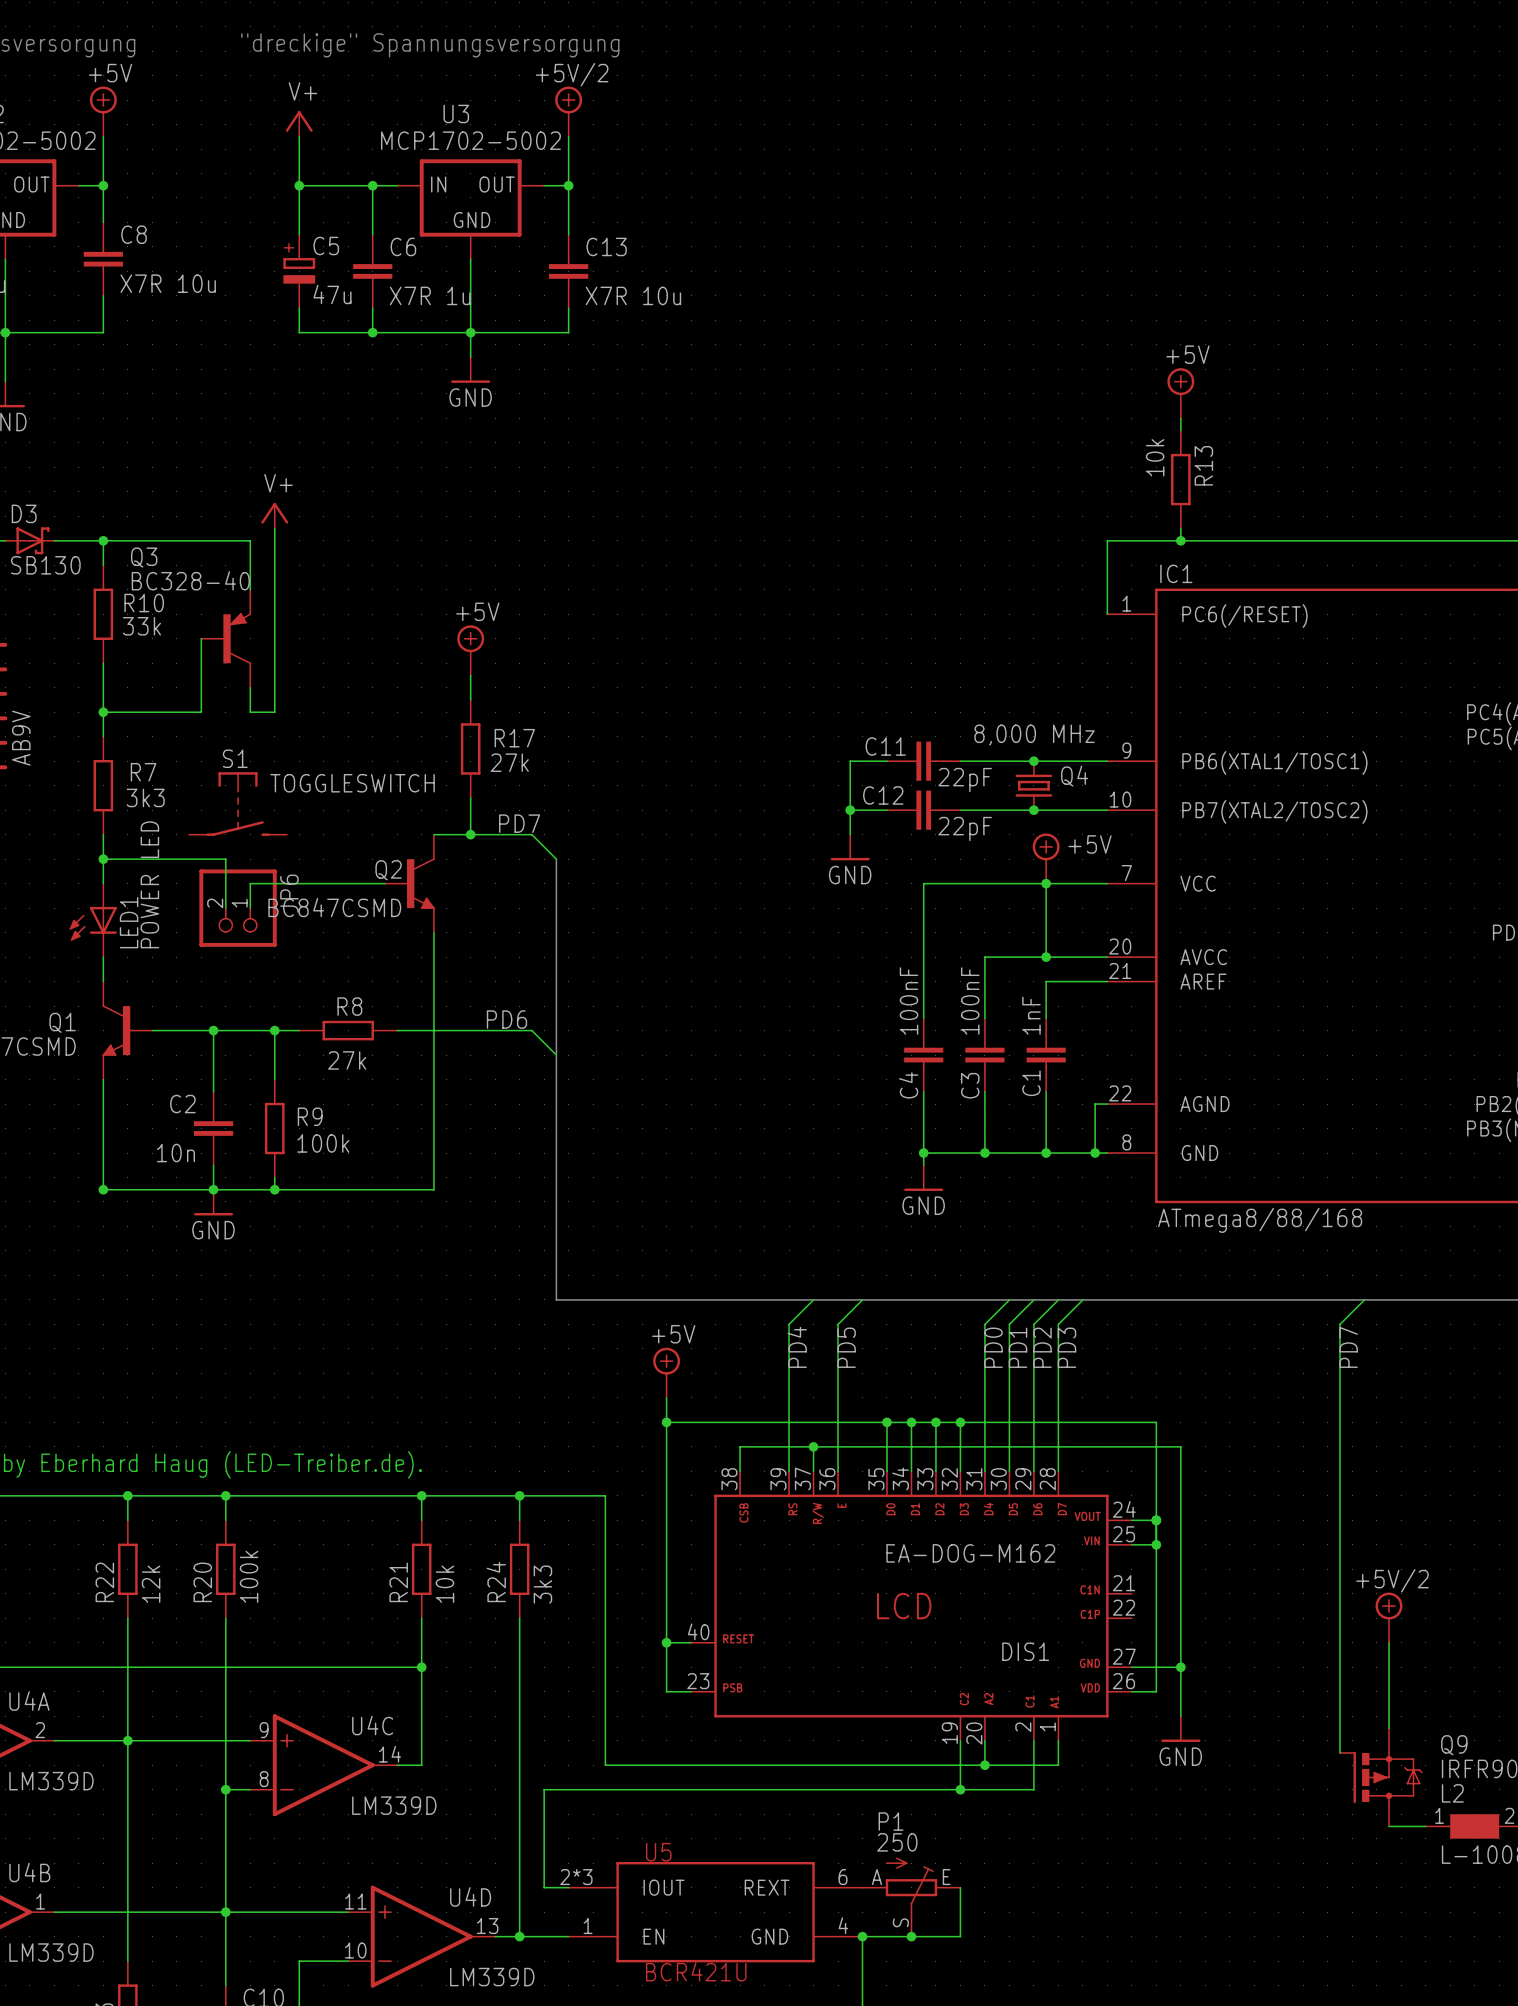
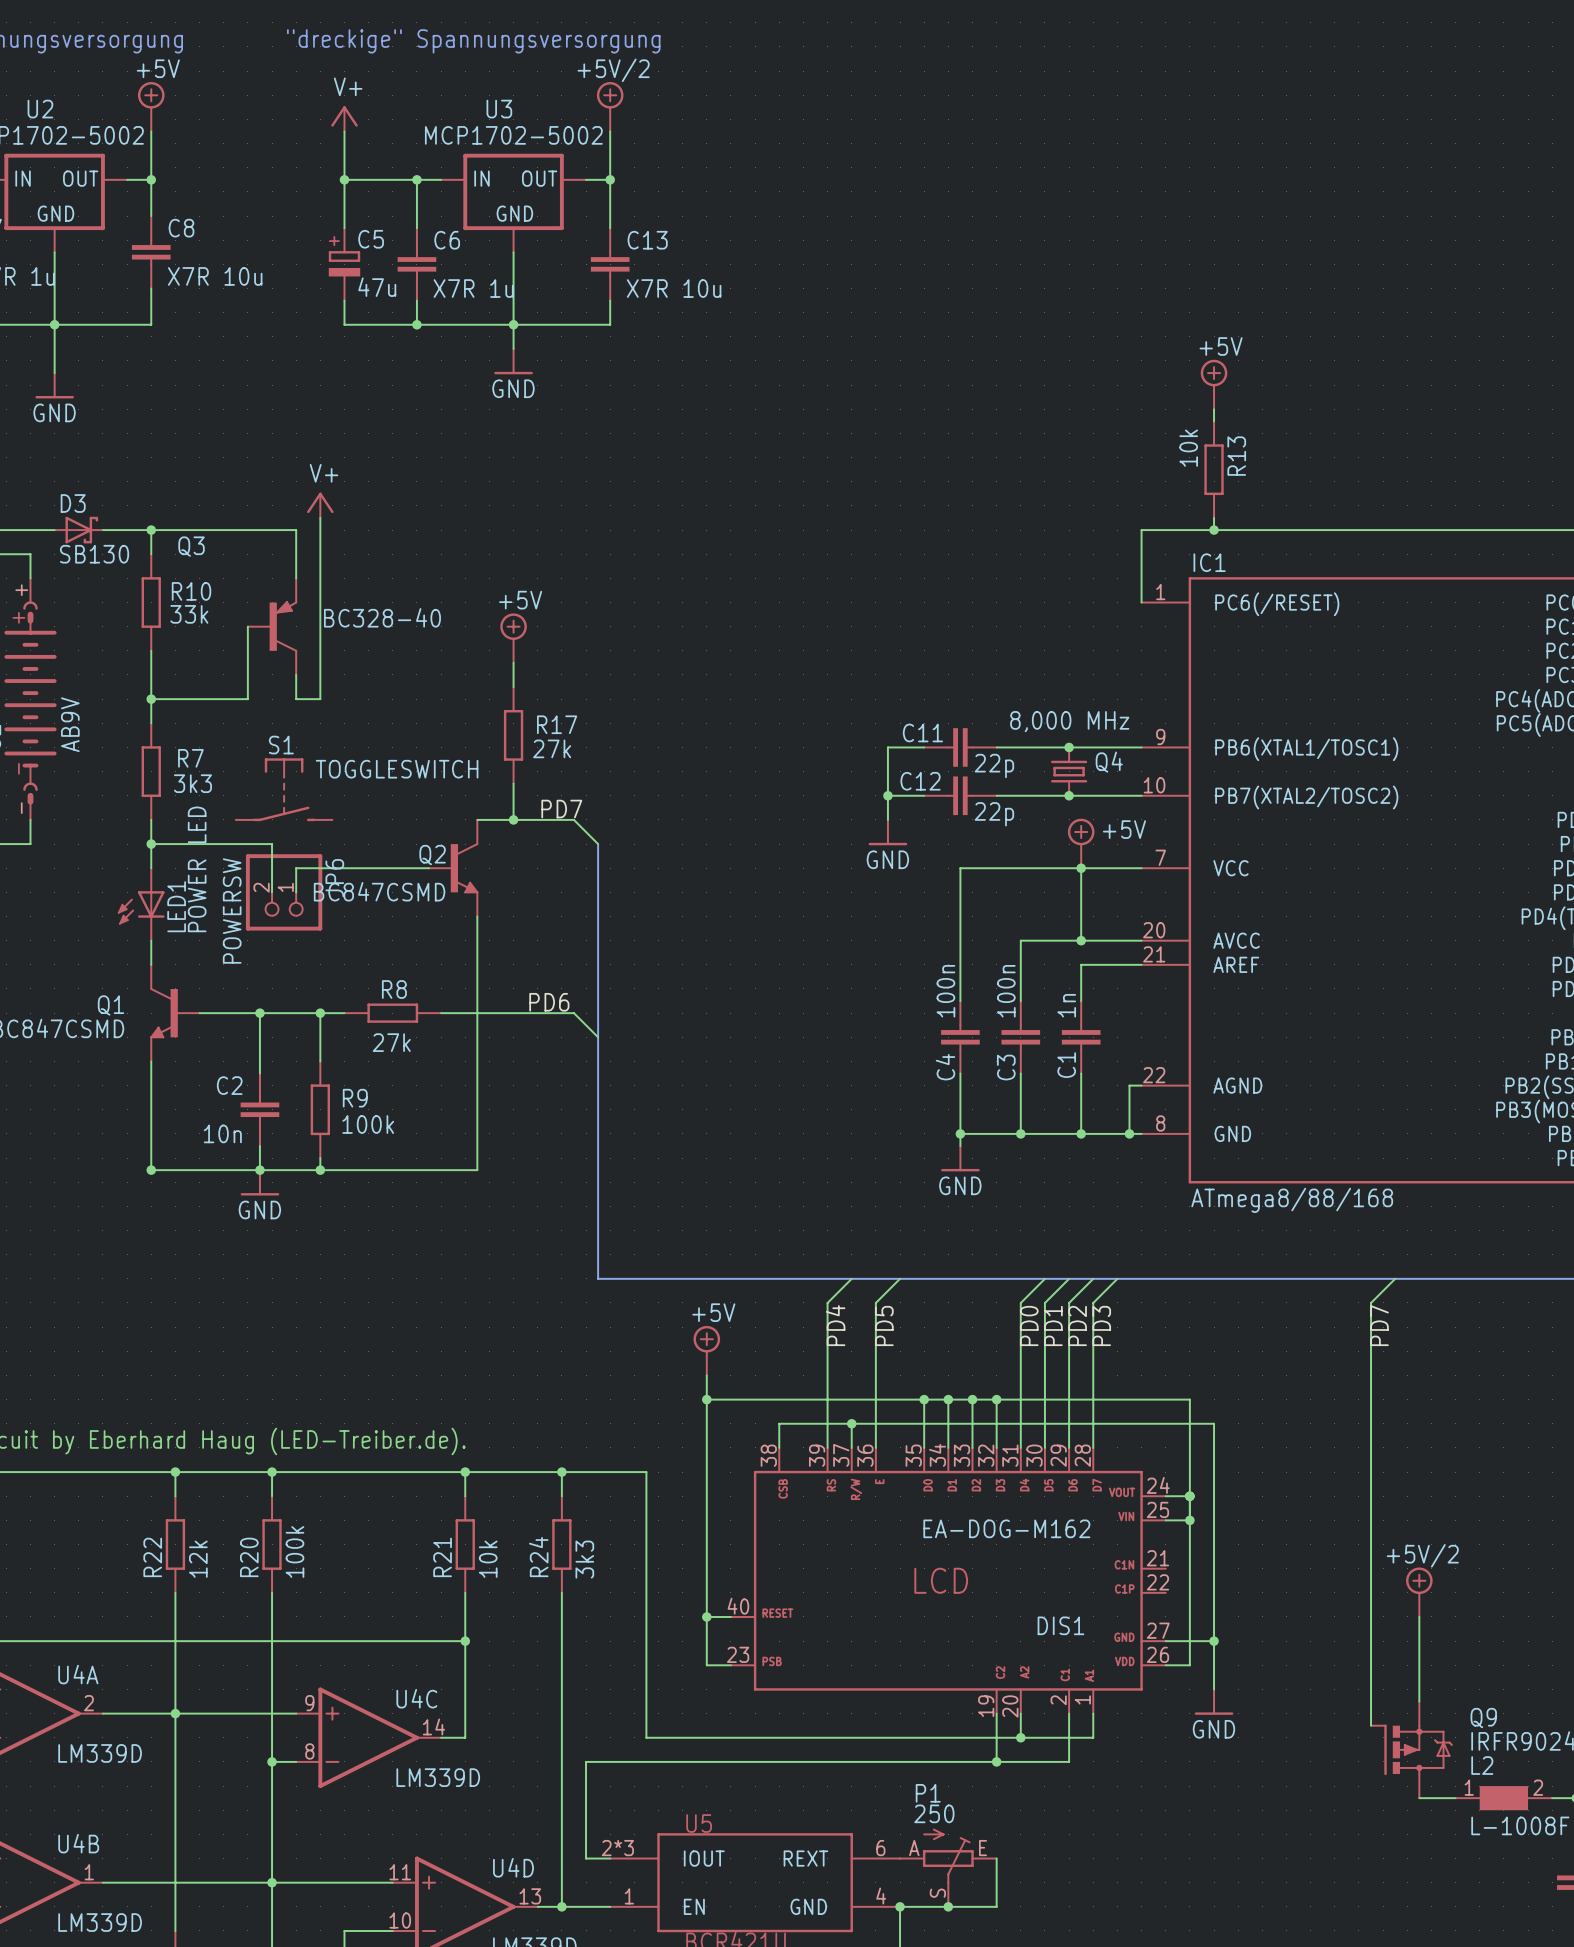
Q3 value position: BC328-40 (190, 580) -> BC328-40 (382, 617)
C11 value: 22pF (965, 779) -> 22p (994, 765)
C12 value: 22pF (965, 828) -> 22p (994, 814)
JP6 value: none -> POWERSW (232, 911)
C4 value: 100nF (909, 1001) -> 100n (945, 991)
C3 value: 100nF (970, 1001) -> 100n (1006, 991)
C1 value: 1nF (1031, 1015) -> 1n (1066, 1005)

